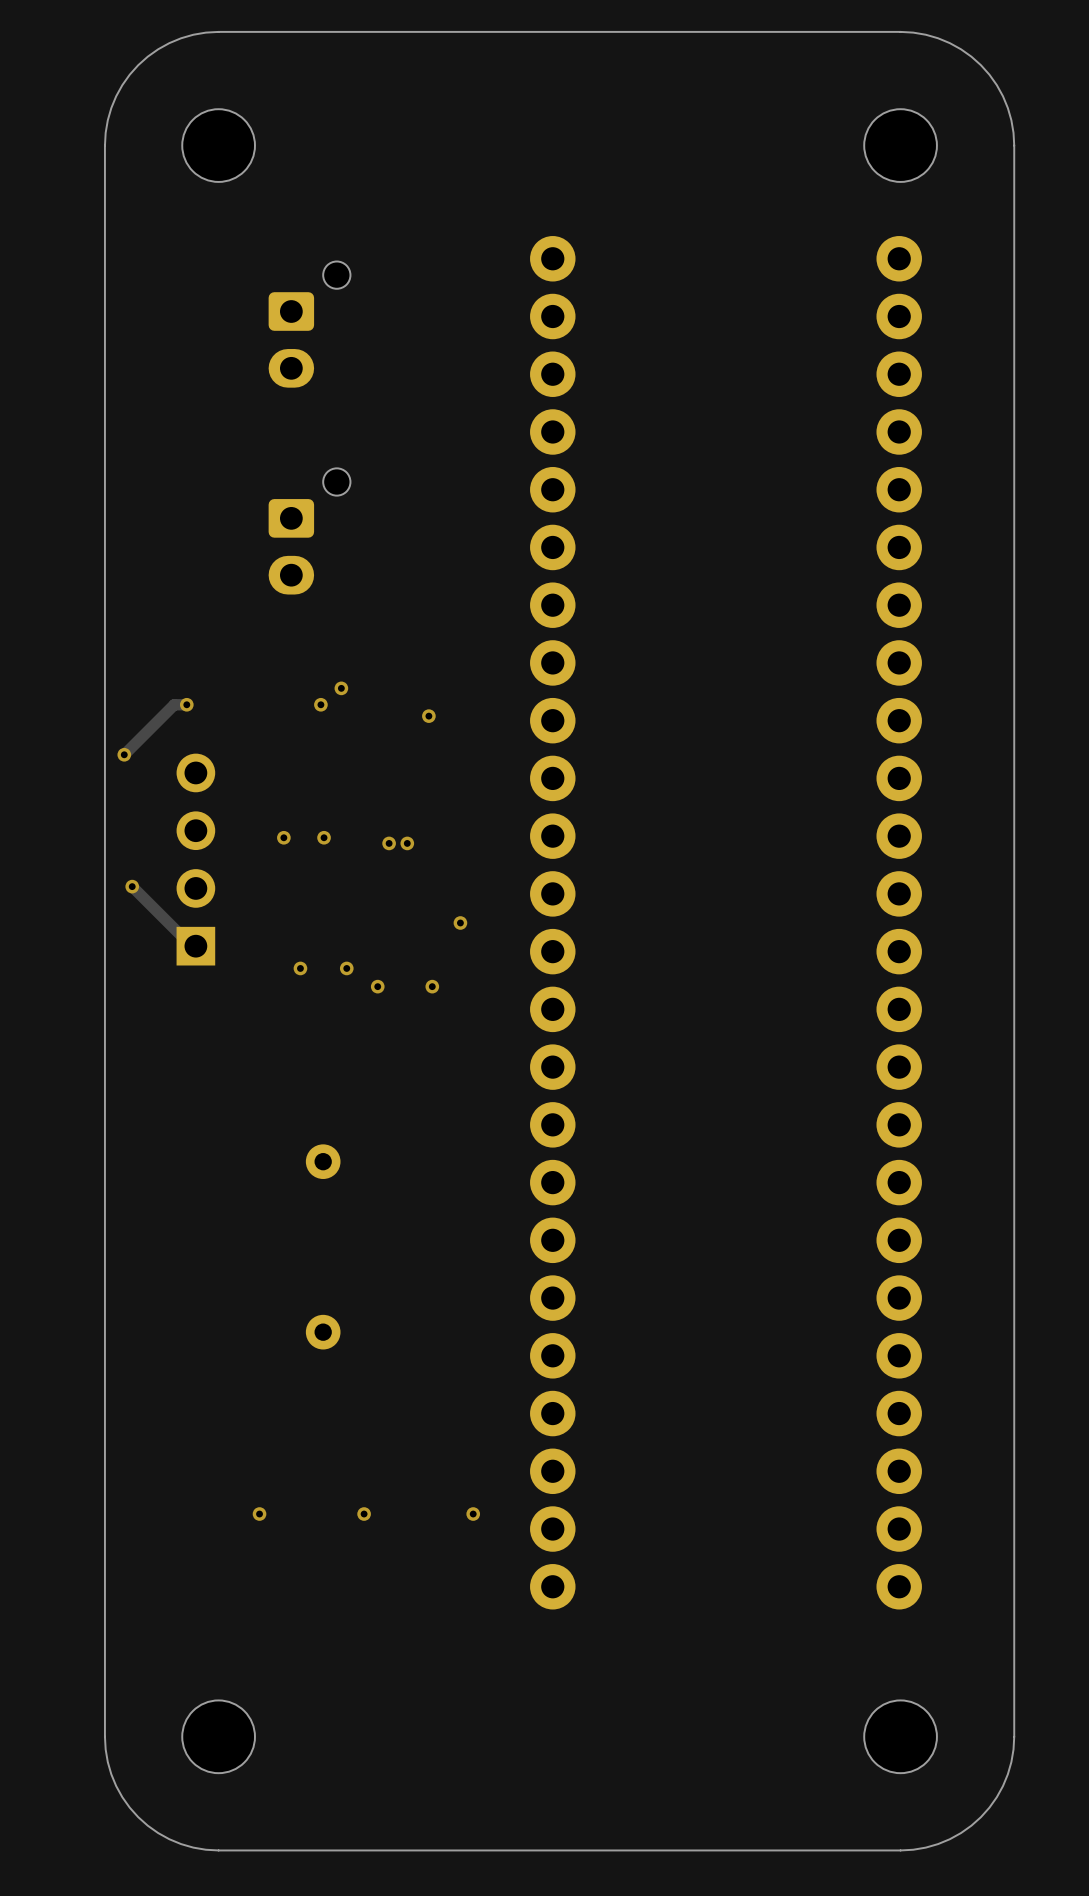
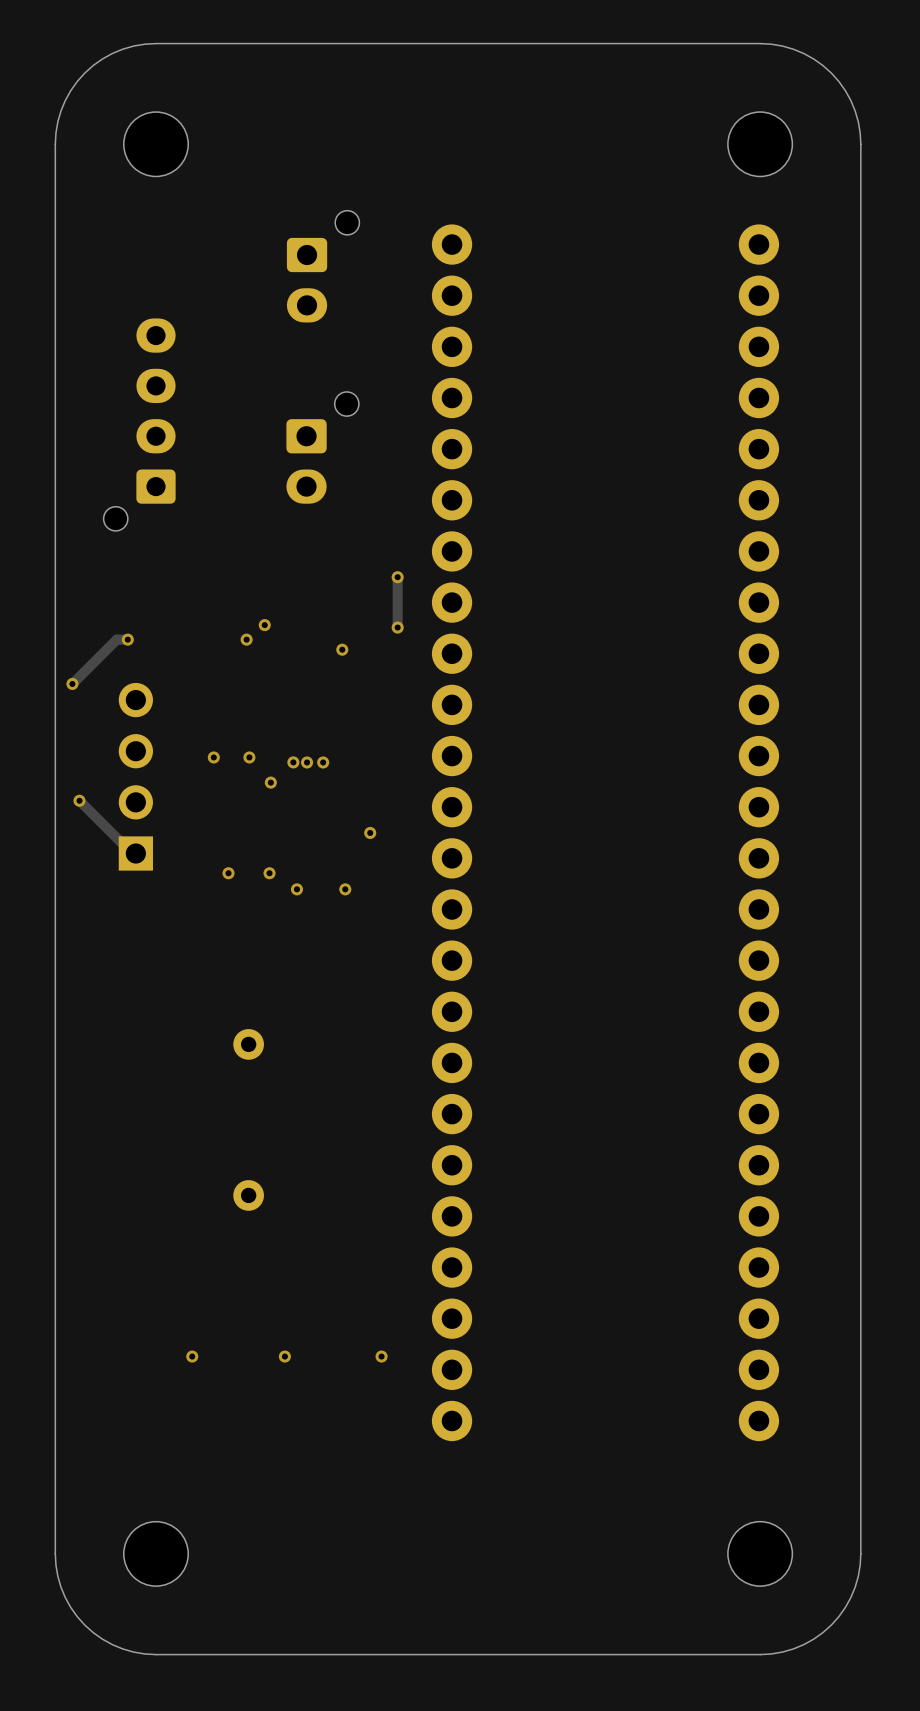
part: none -> (323, 266)
part: (309, 324) -> none
part: none -> (139, 424)
part: none -> (322, 447)
part: (309, 531) -> none
track: none -> (397, 577) (397, 627)
via: none -> (397, 577)
via: none -> (397, 627)
via: none -> (293, 762)
via: none -> (270, 782)

